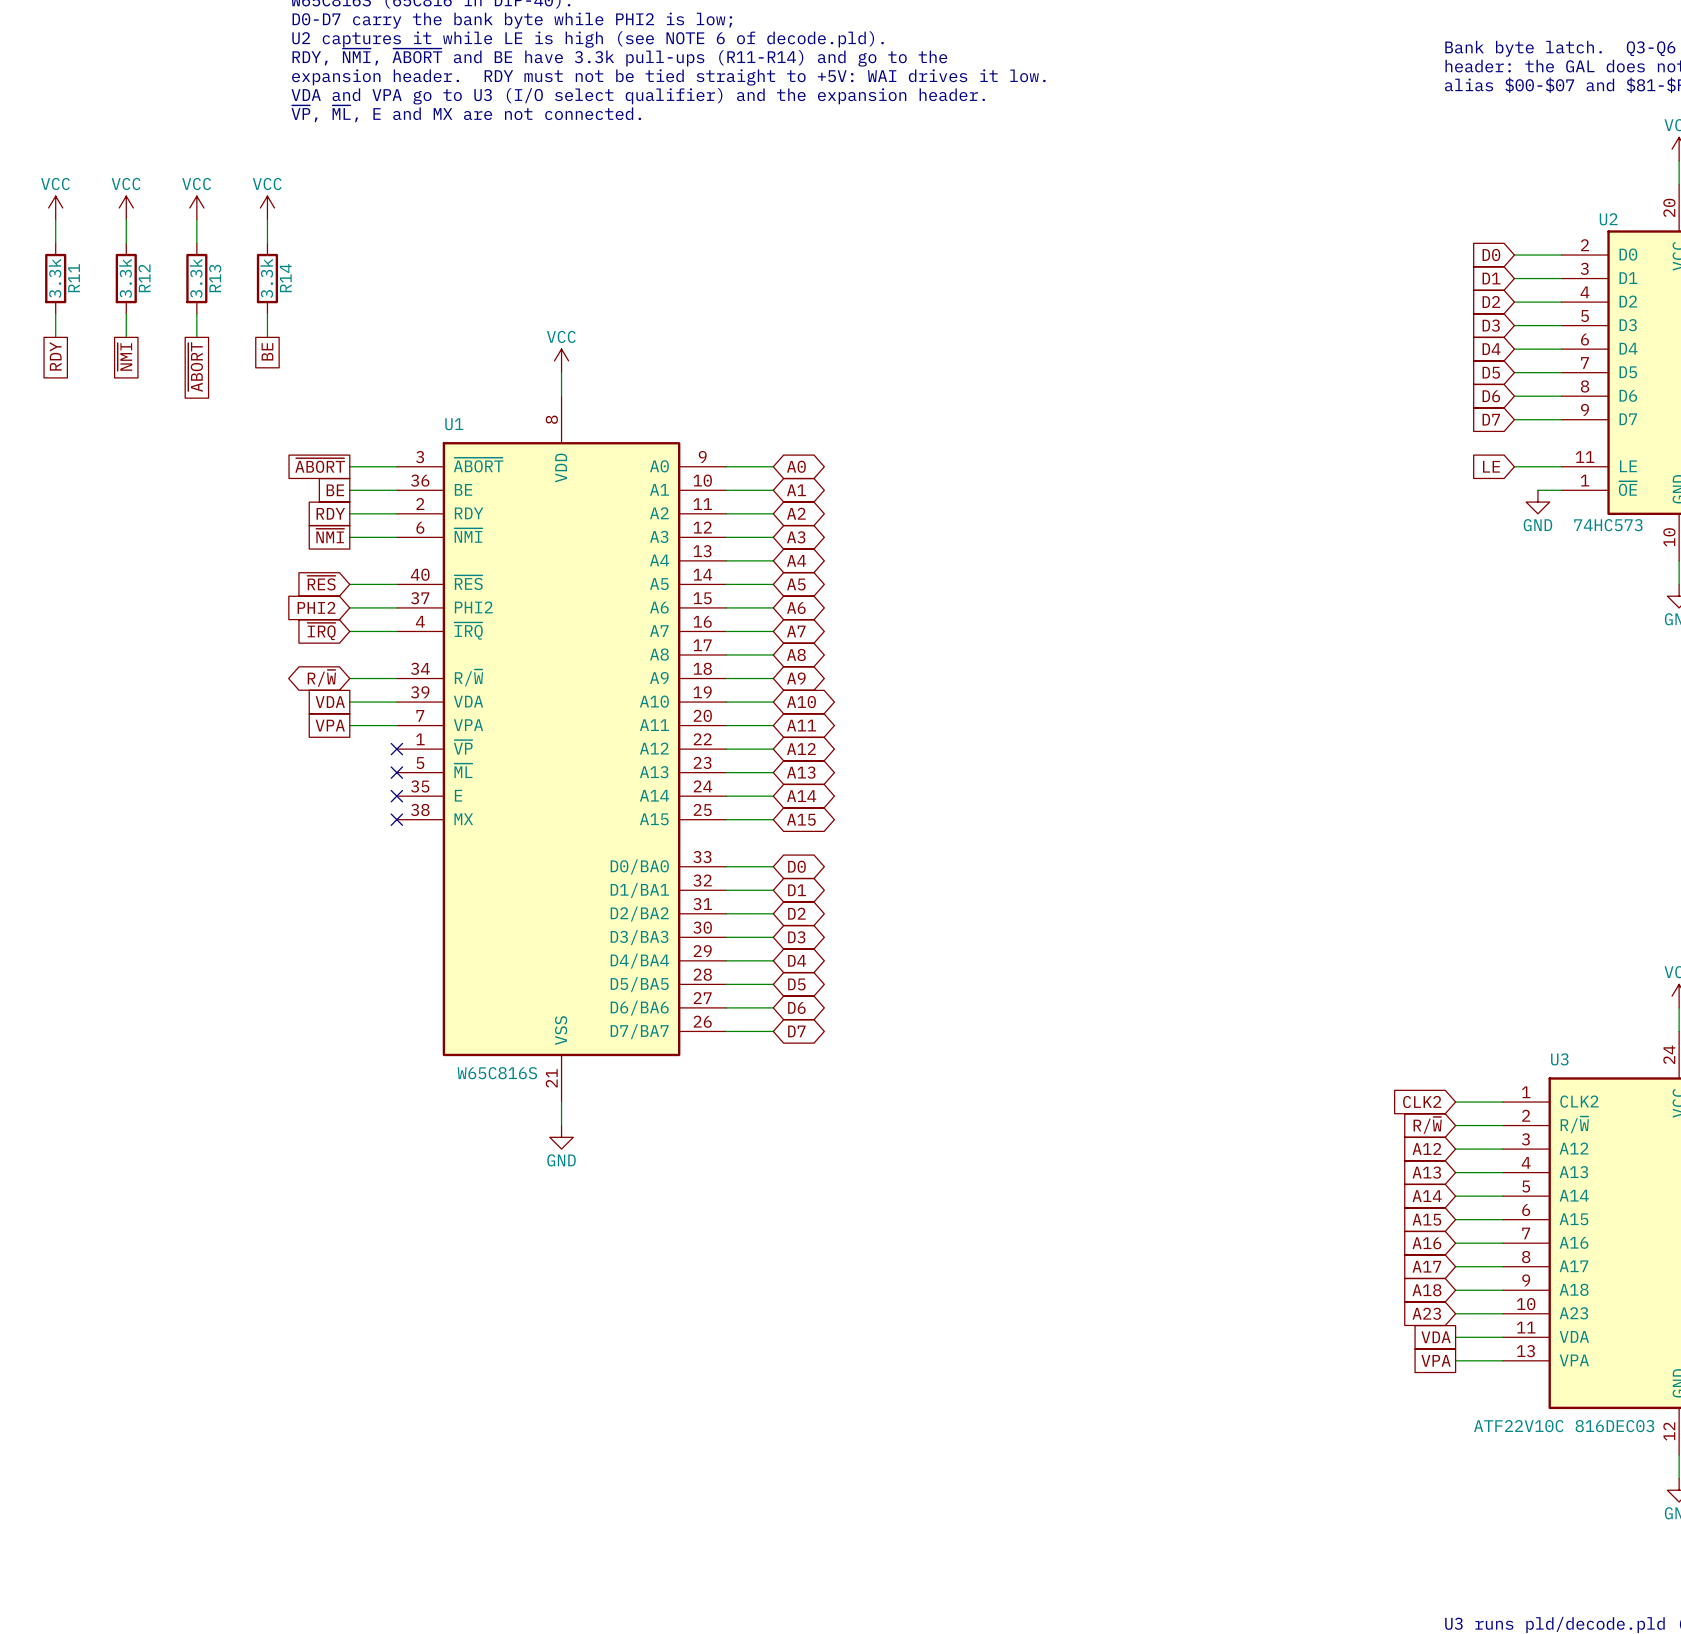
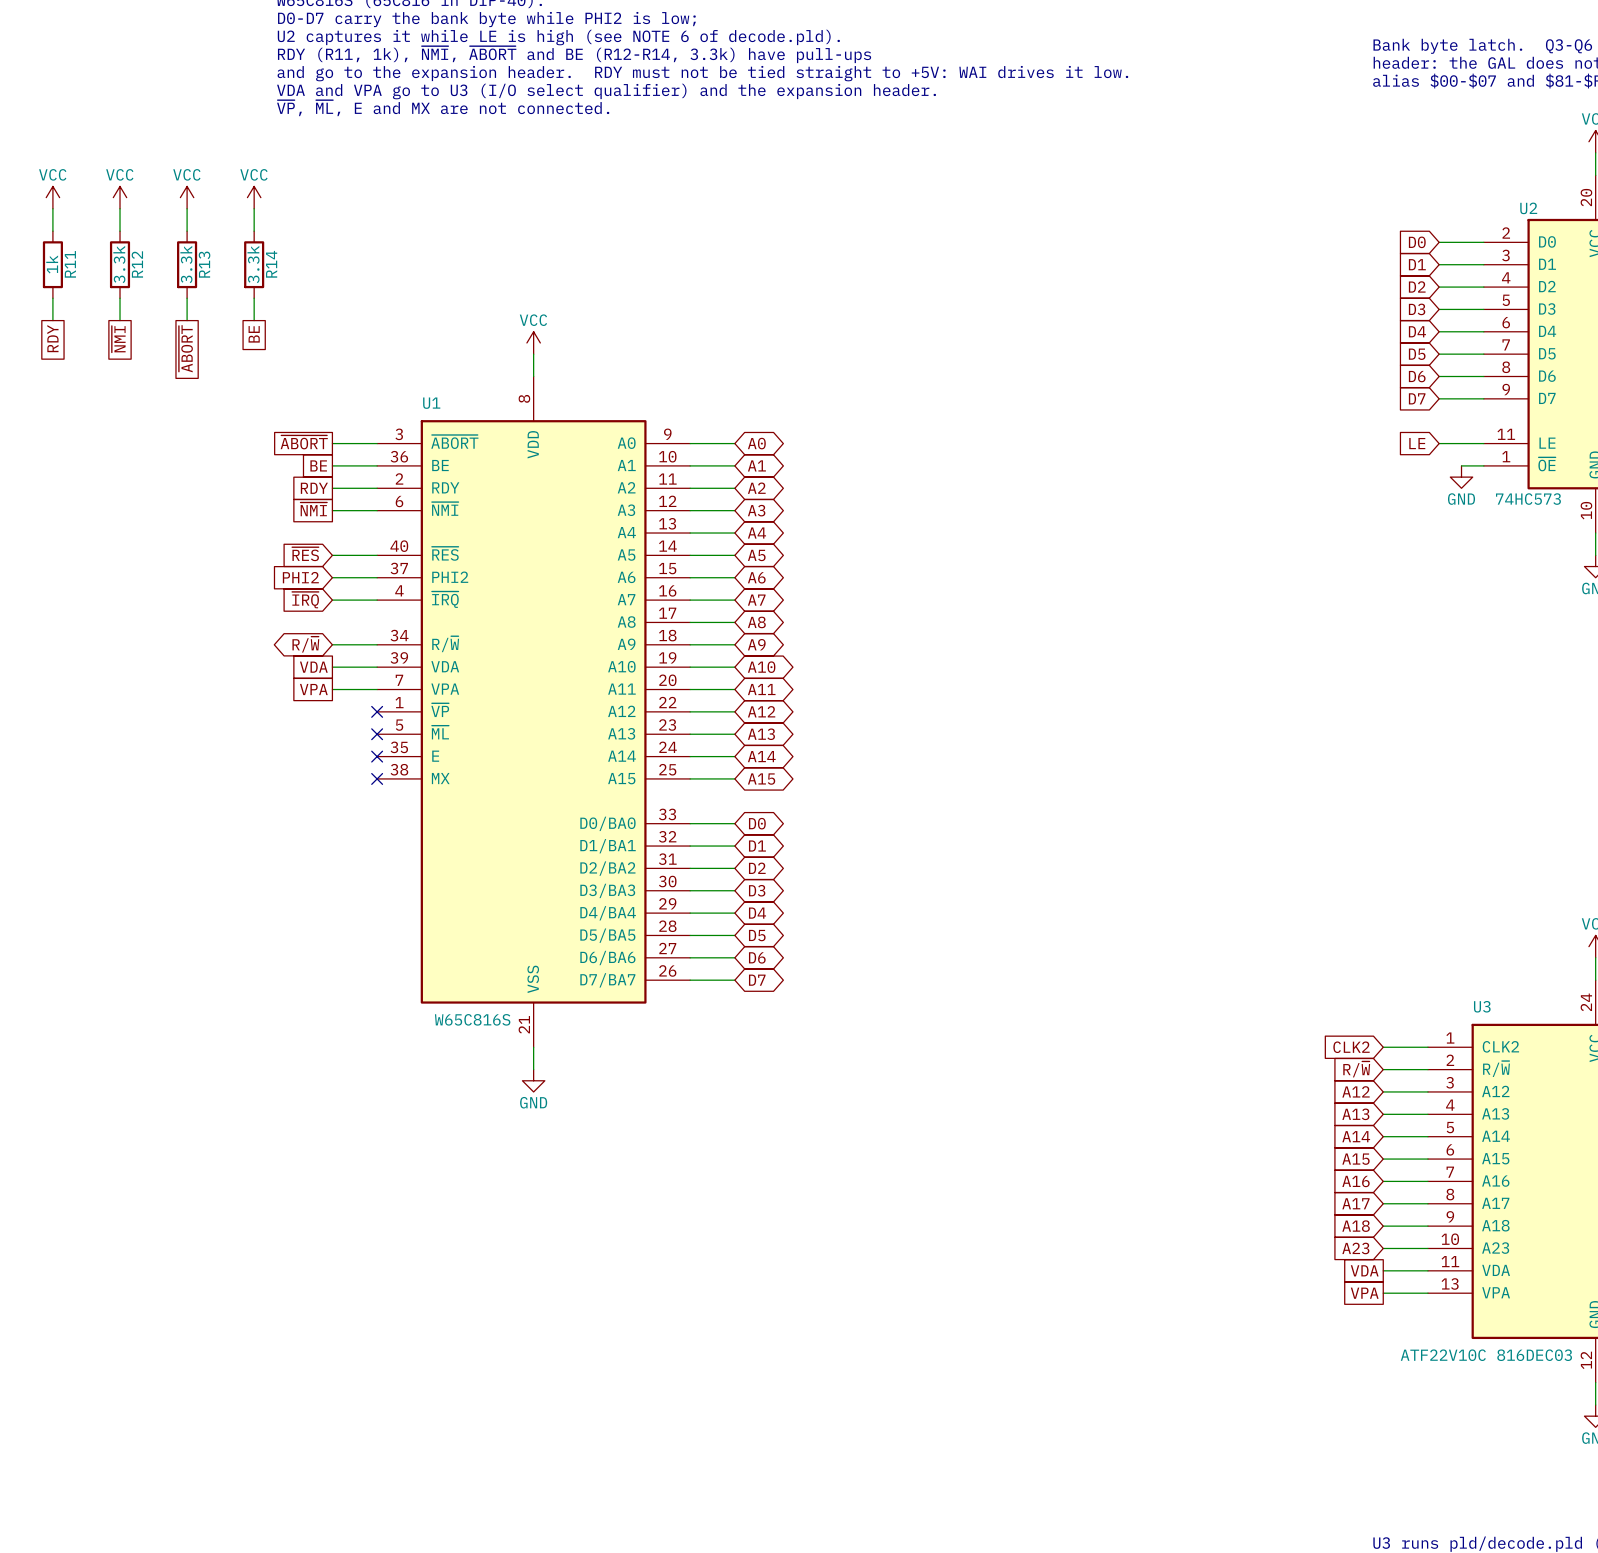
text: RDY, ~{NMI}, ~{ABORT} and BE have 3.3k pull-ups (R11-R14) and go to the (619, 57) -> RDY (R11, 1k), ~{NMI}, ~{ABORT} and BE (R12-R14, 3.3k) have pull-ups (574, 54)
text: expansion header. RDY must not be tied straight to +5V: WAI drives it low. (668, 77) -> and go to the expansion header. RDY must not be tied straight to +5V: WAI drives it low. (702, 73)
R11 value: 3.3k (55, 278) -> 1k (52, 264)

